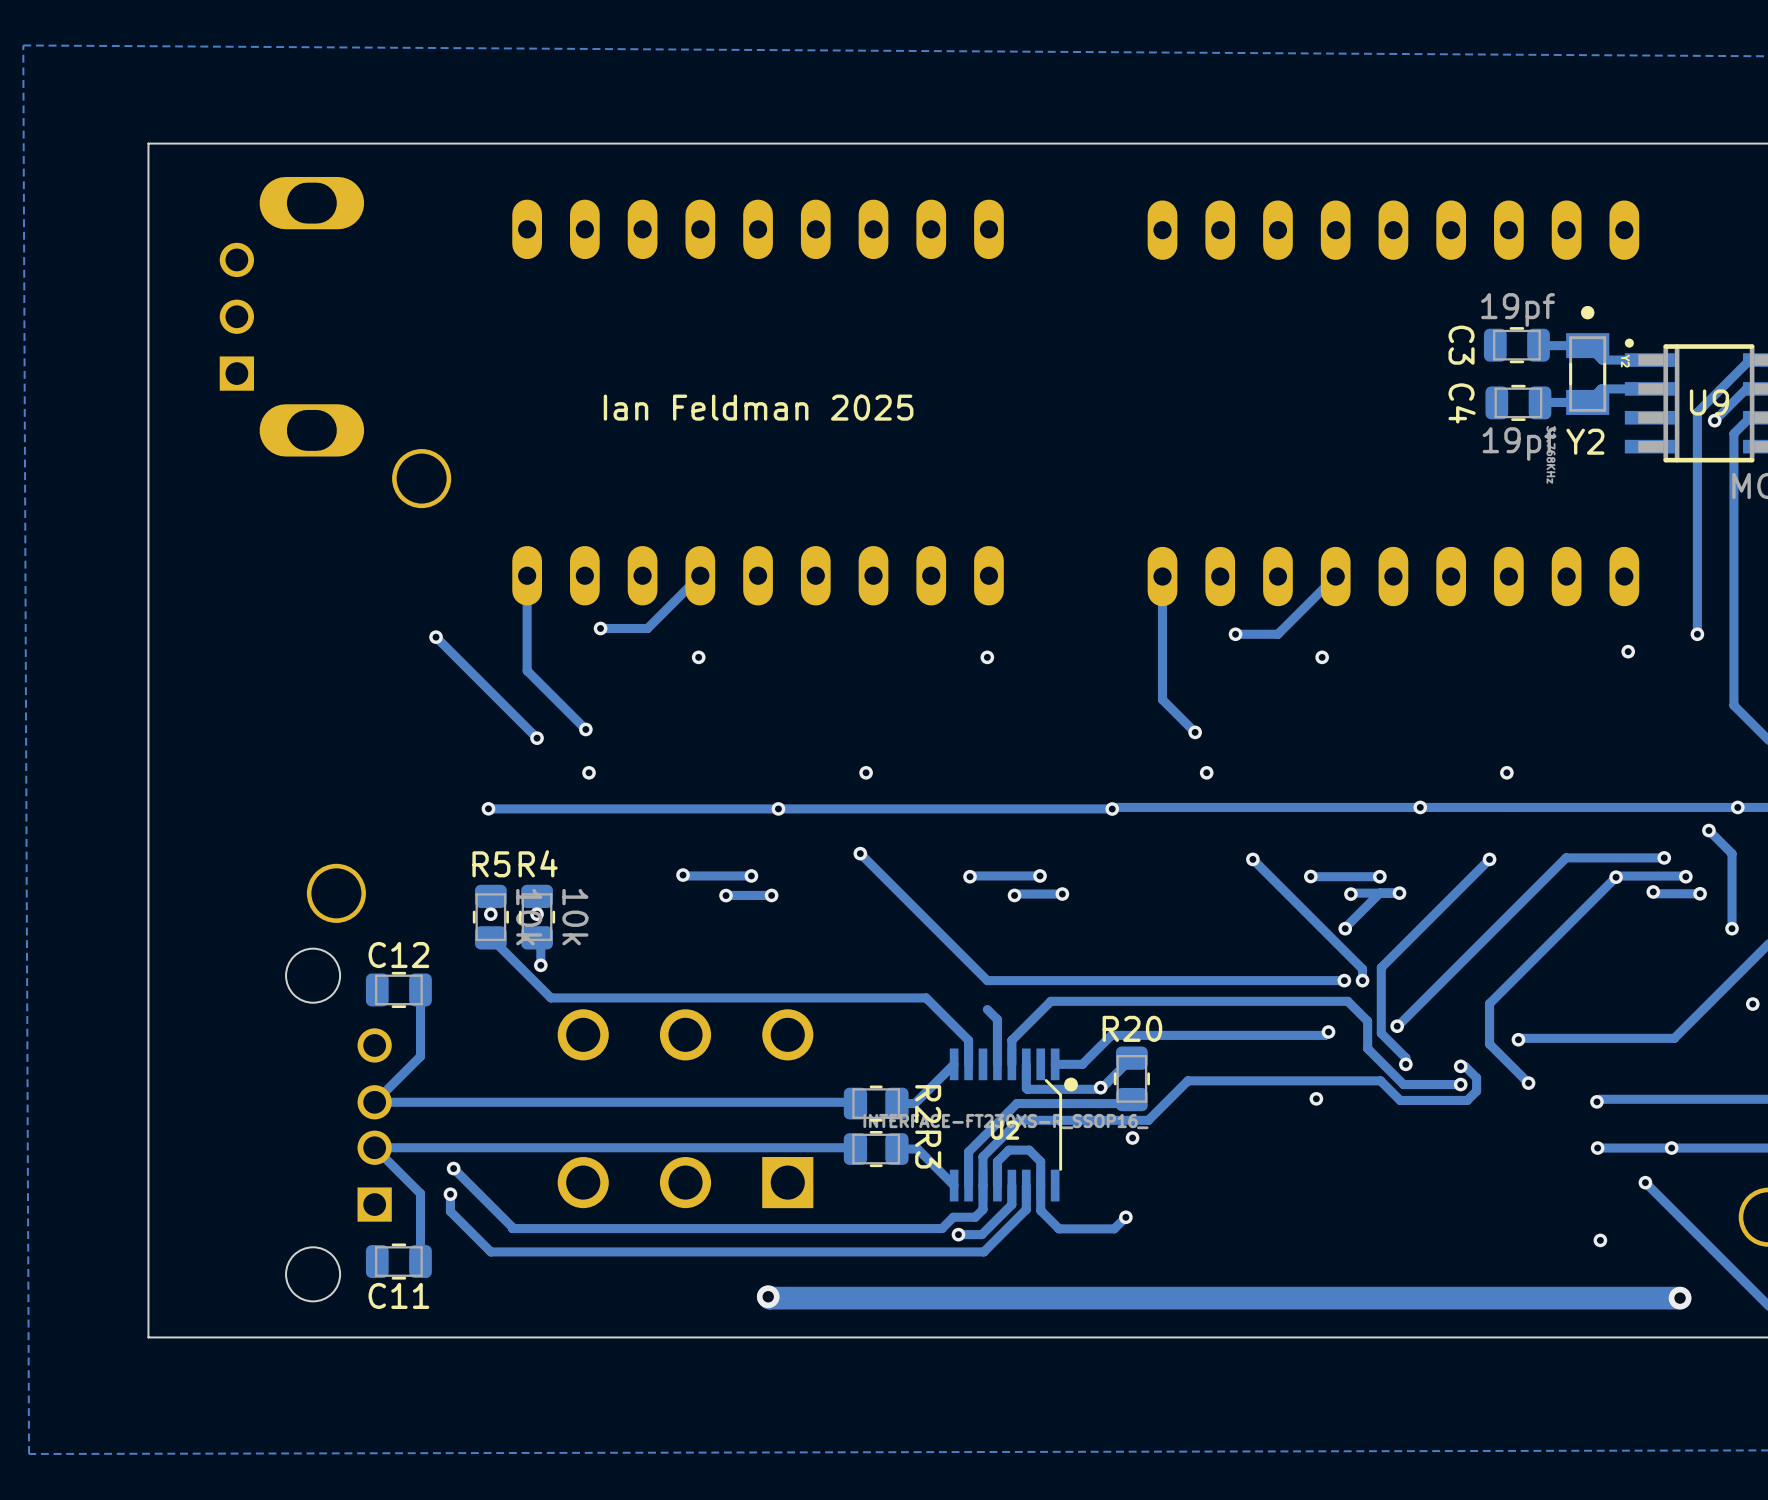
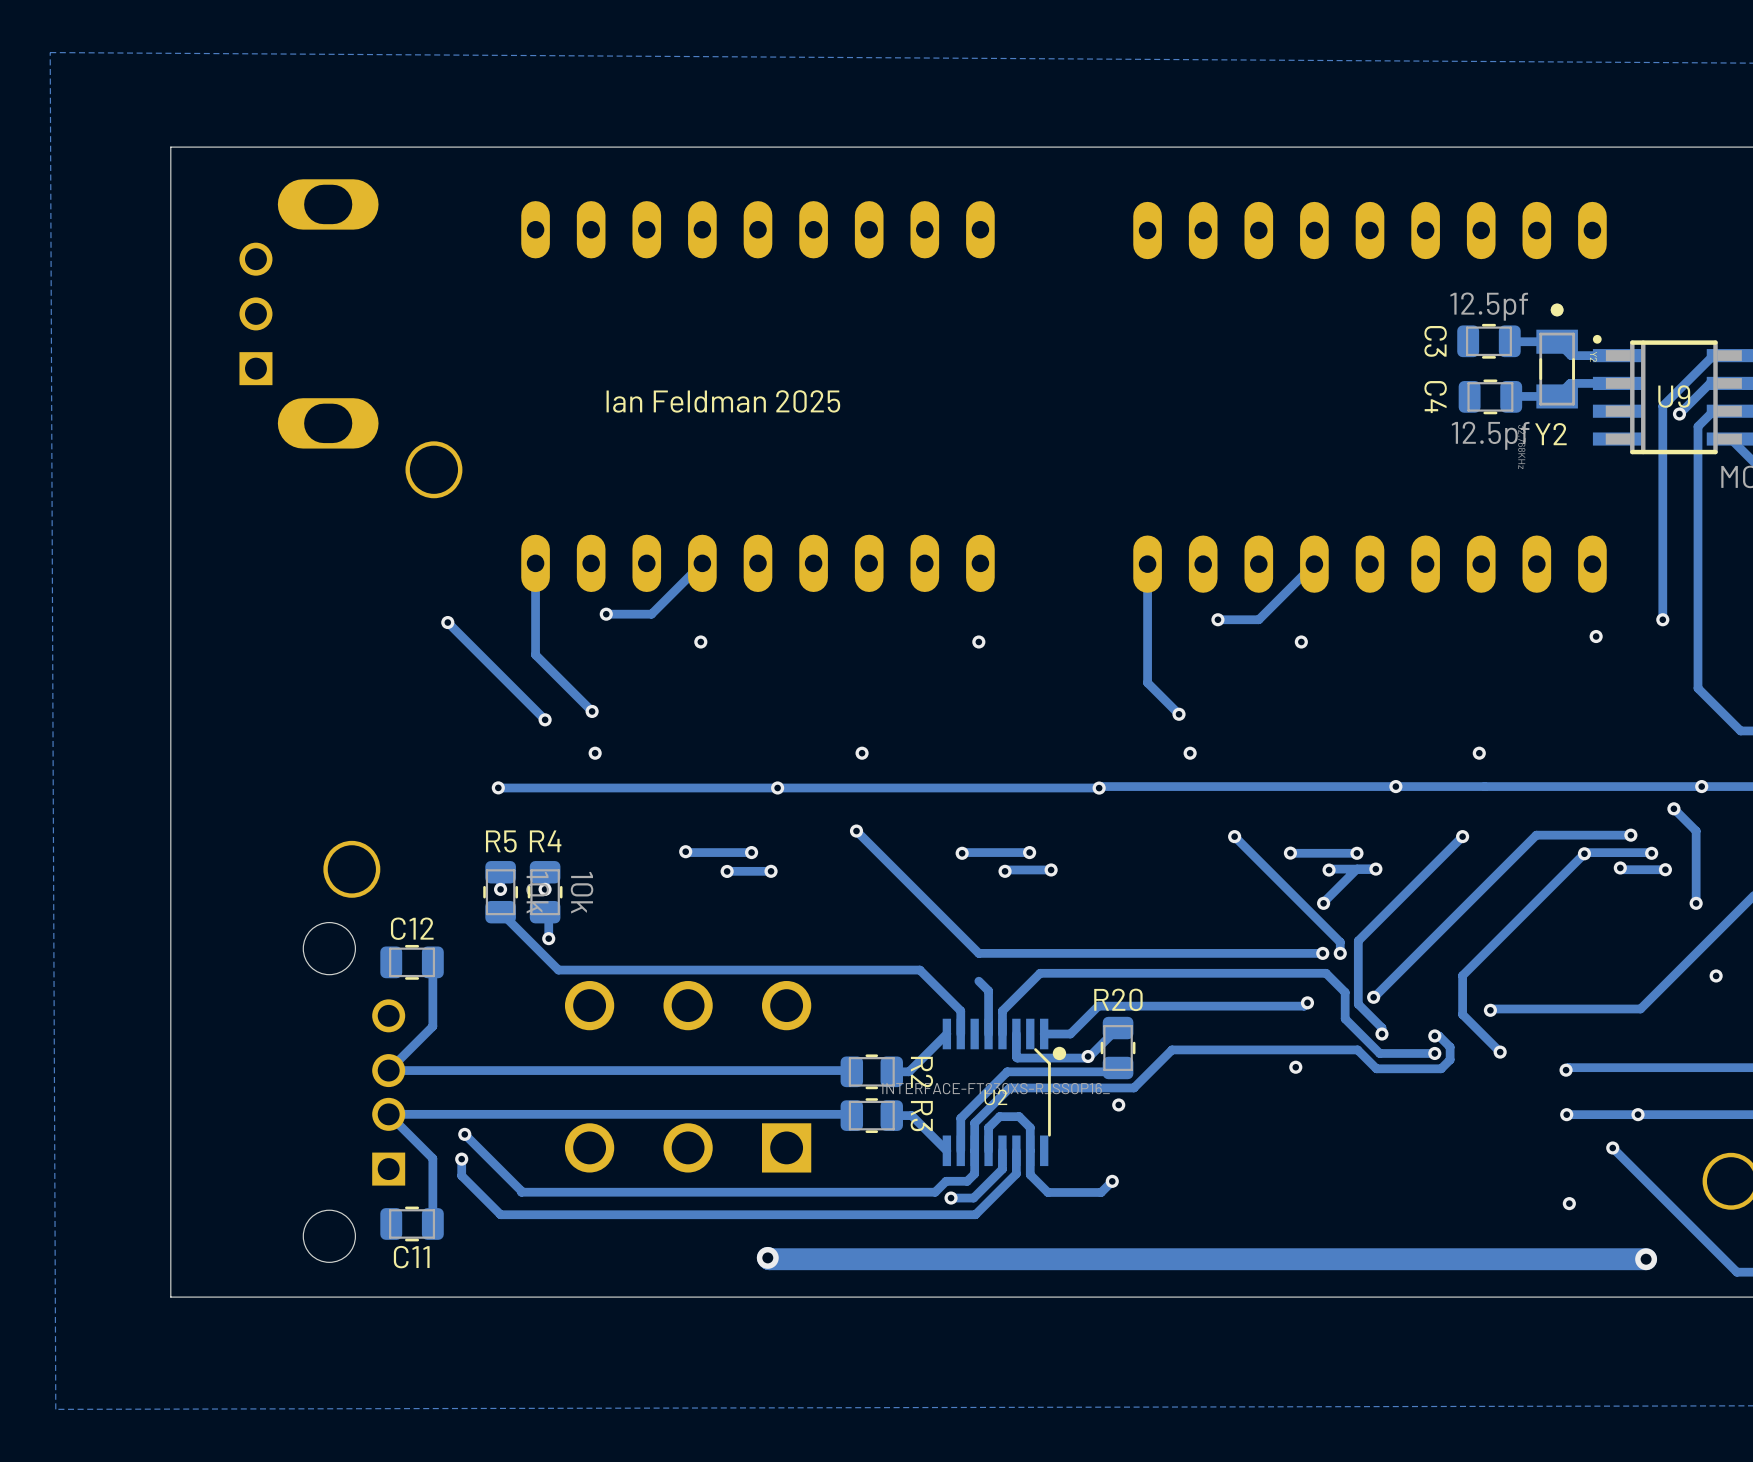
C3 value: 19pf (1518, 309) -> 12.5pf (1489, 306)
C4 value: 19pf (1519, 444) -> 12.5pf (1490, 435)

